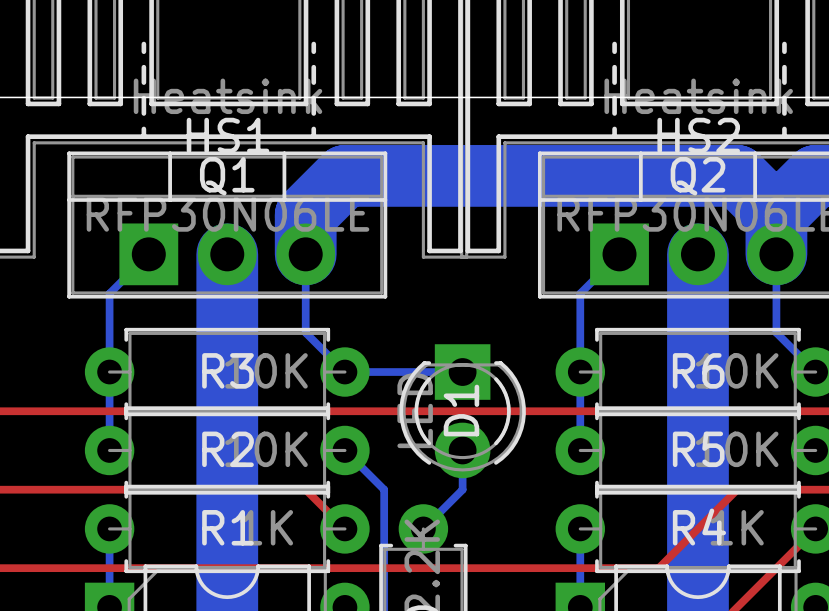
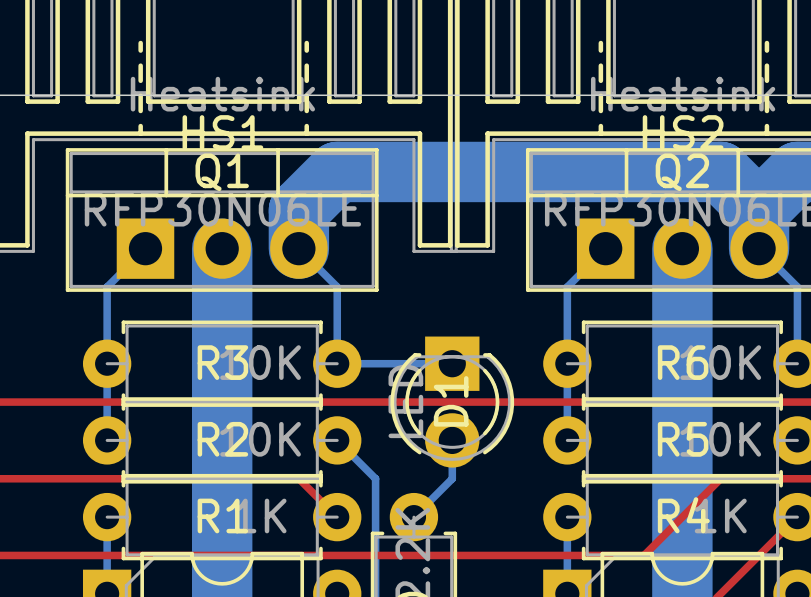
bottom track: (305, 254) (305, 332) (344, 372) -> (298, 248) (337, 287) (337, 363)
bottom track: (776, 254) (776, 332) (815, 372) -> (759, 248) (797, 287) (797, 363)

